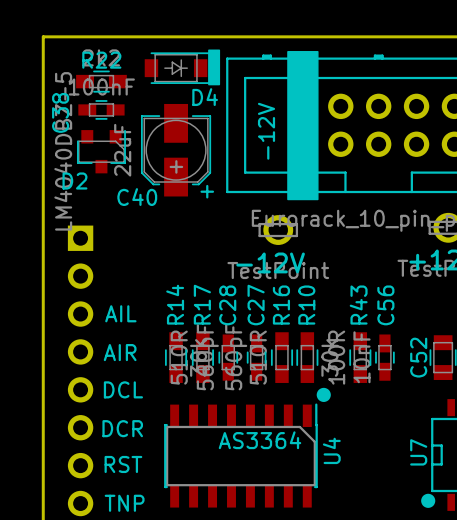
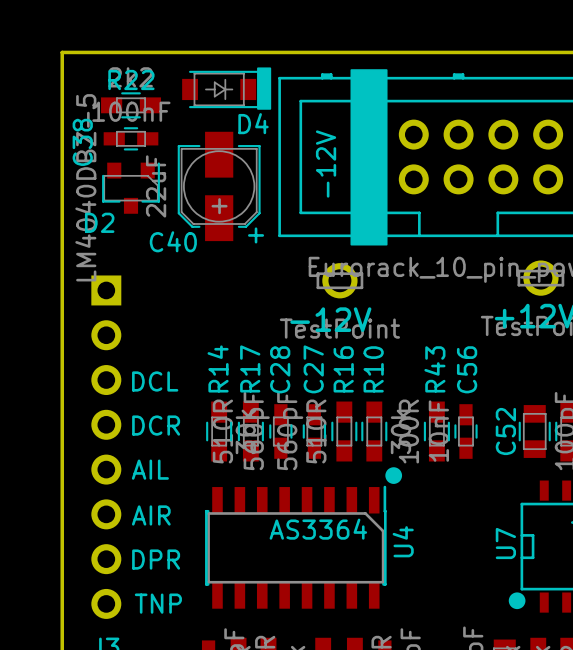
text: AIL (120, 313) -> DCL (155, 381)
text: AIR (120, 352) -> DCR (156, 425)
text: DCL (123, 389) -> AIL (150, 469)
text: DCR (122, 428) -> AIR (151, 515)
text: RST (123, 464) -> DPR (156, 559)

